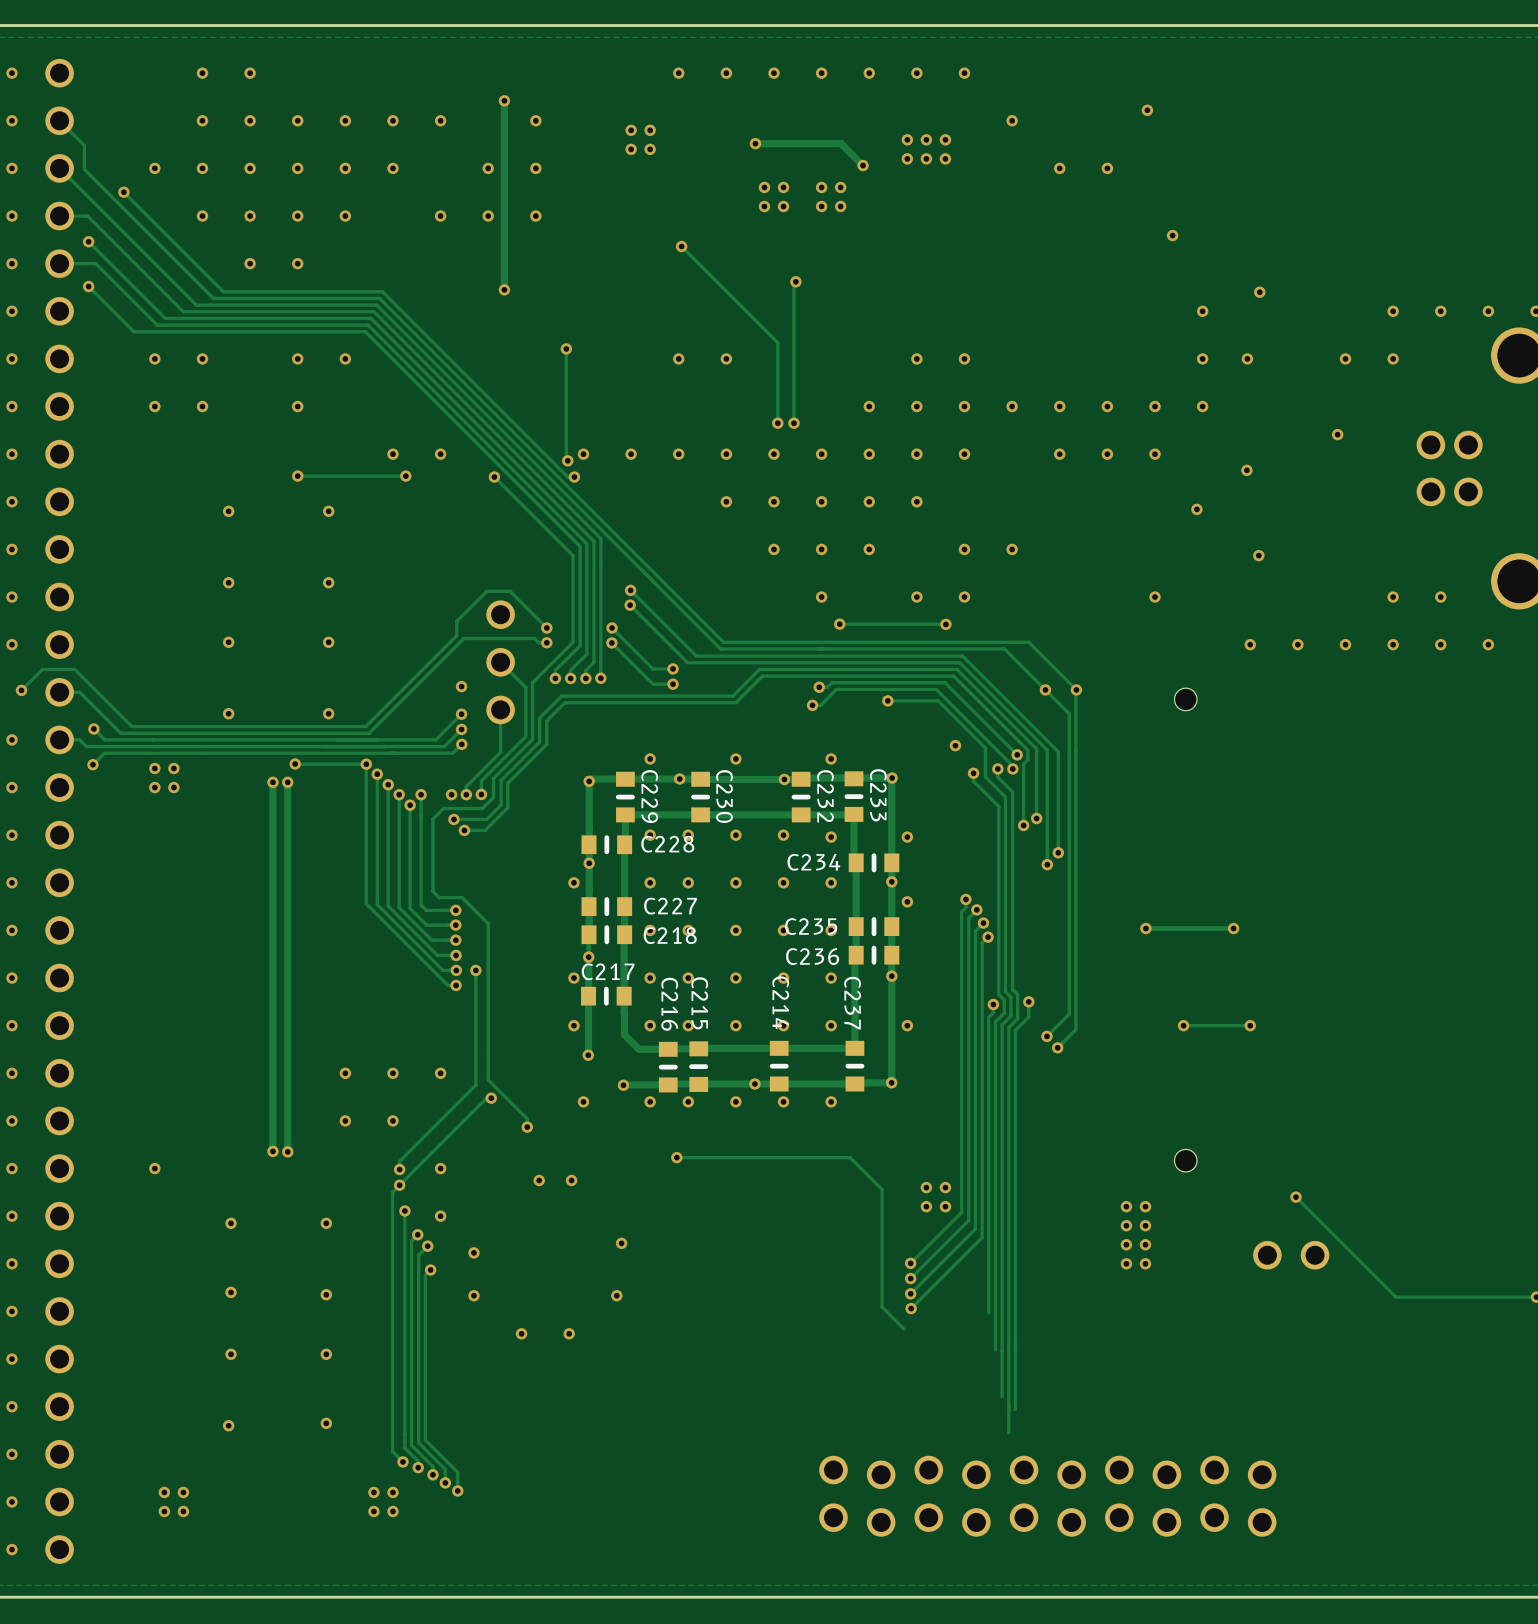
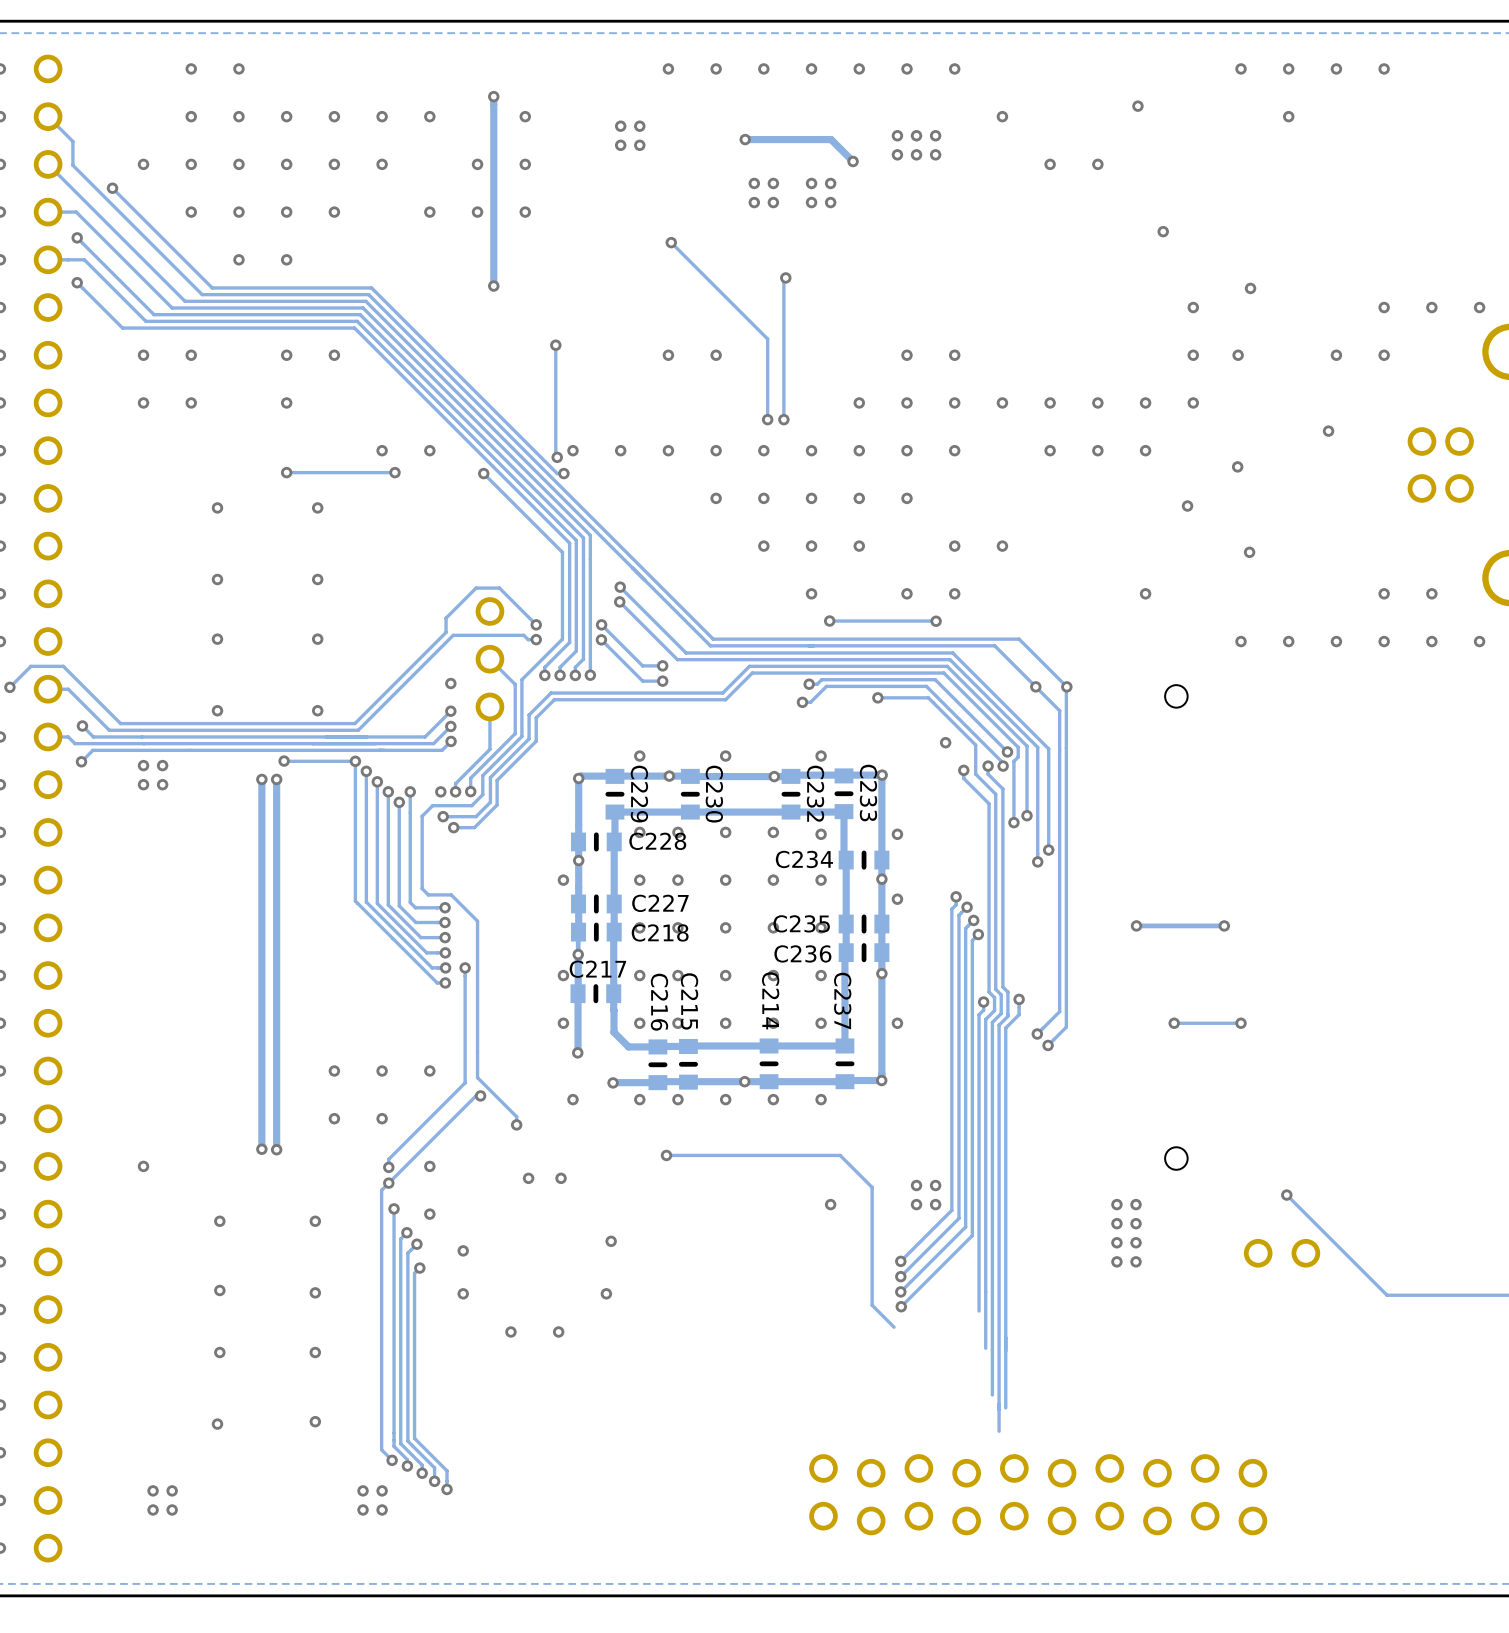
via: none -> (1241, 68)
via: none -> (1288, 68)
via: none -> (1336, 68)
via: none -> (1384, 68)
via: none -> (1288, 116)
via: none -> (830, 1204)

